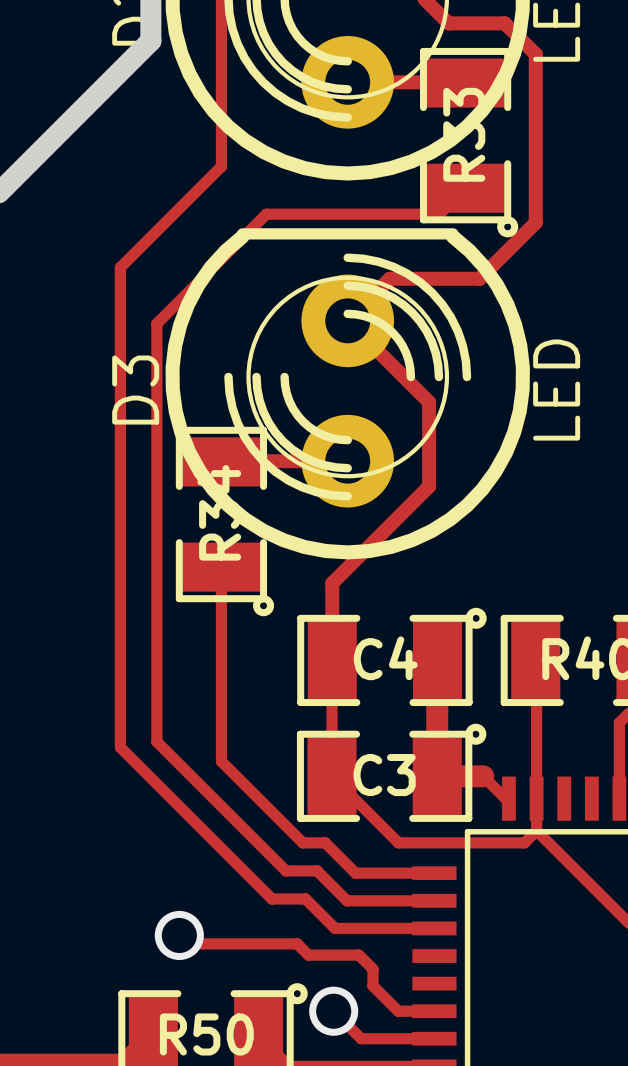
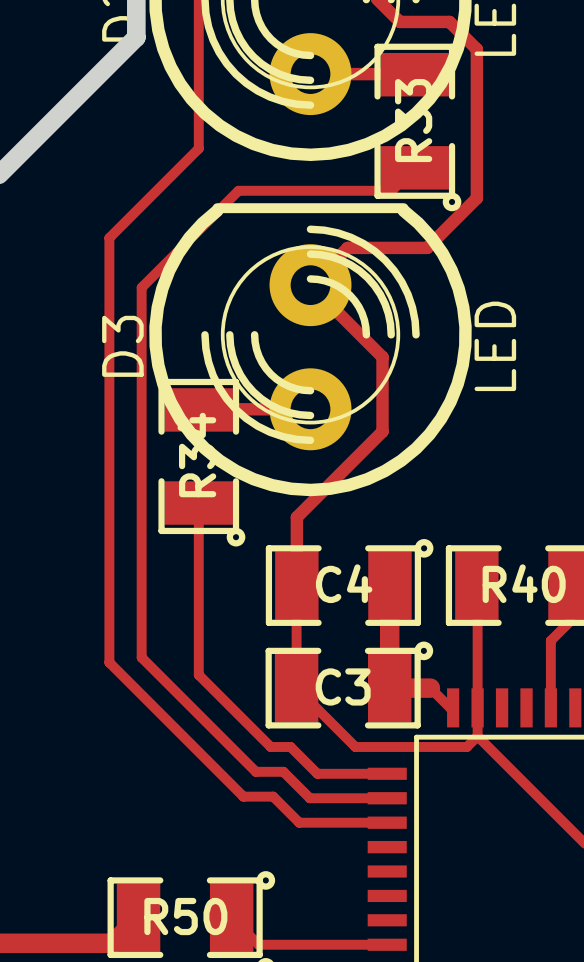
track: (179, 935) (187, 943) (297, 943) (308, 955) (358, 955) (372, 969) (372, 985) (398, 1011) (434, 1011) -> none
via: (179, 935) -> none
track: (333, 1011) (361, 1038) (434, 1038) -> none
via: (333, 1011) -> none

